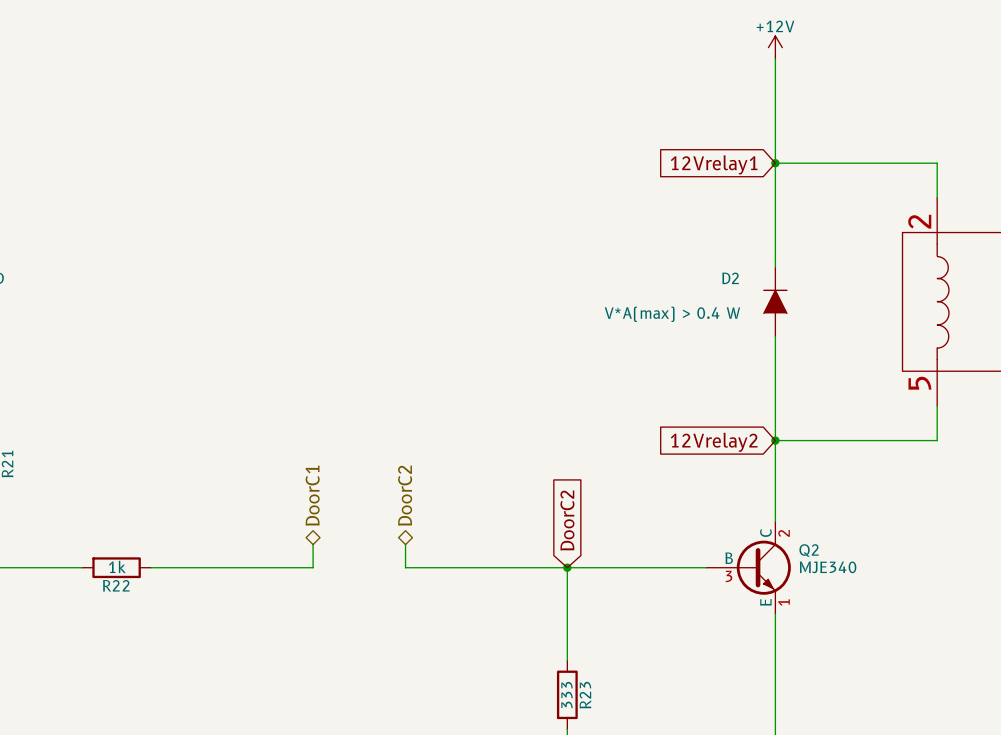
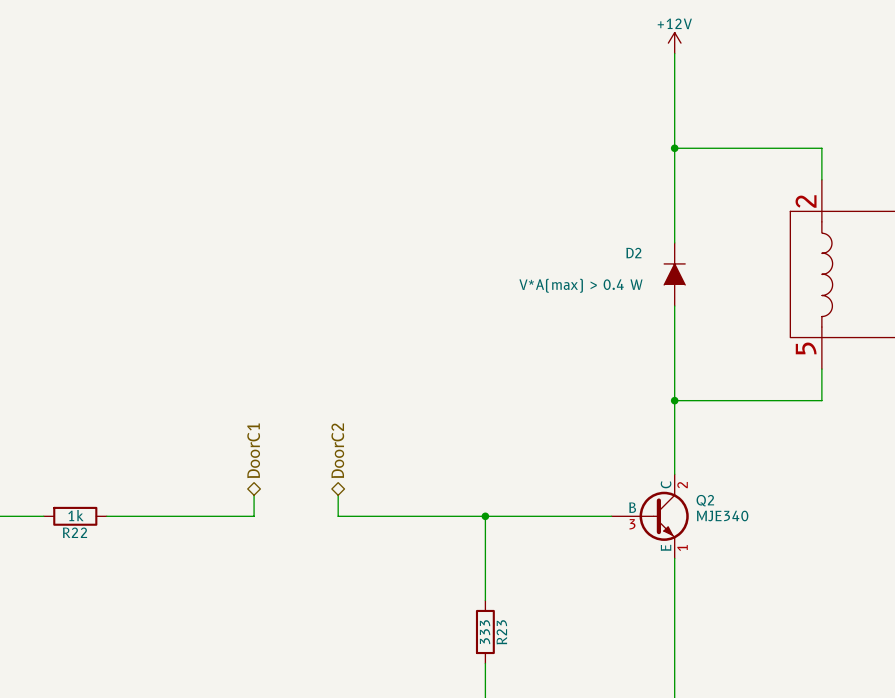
global label: 12Vrelay1 (714, 164) -> none
global label: 12Vrelay2 (714, 442) -> none
global label: DoorC2 (567, 520) -> none

